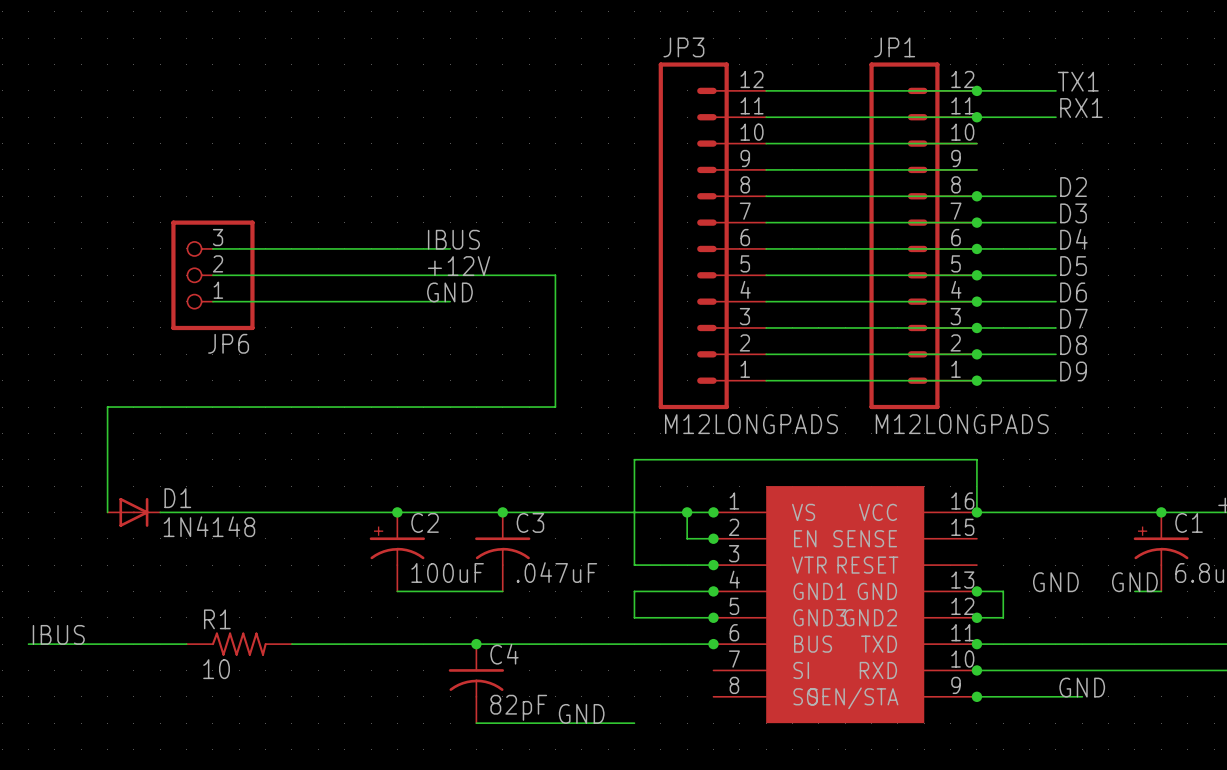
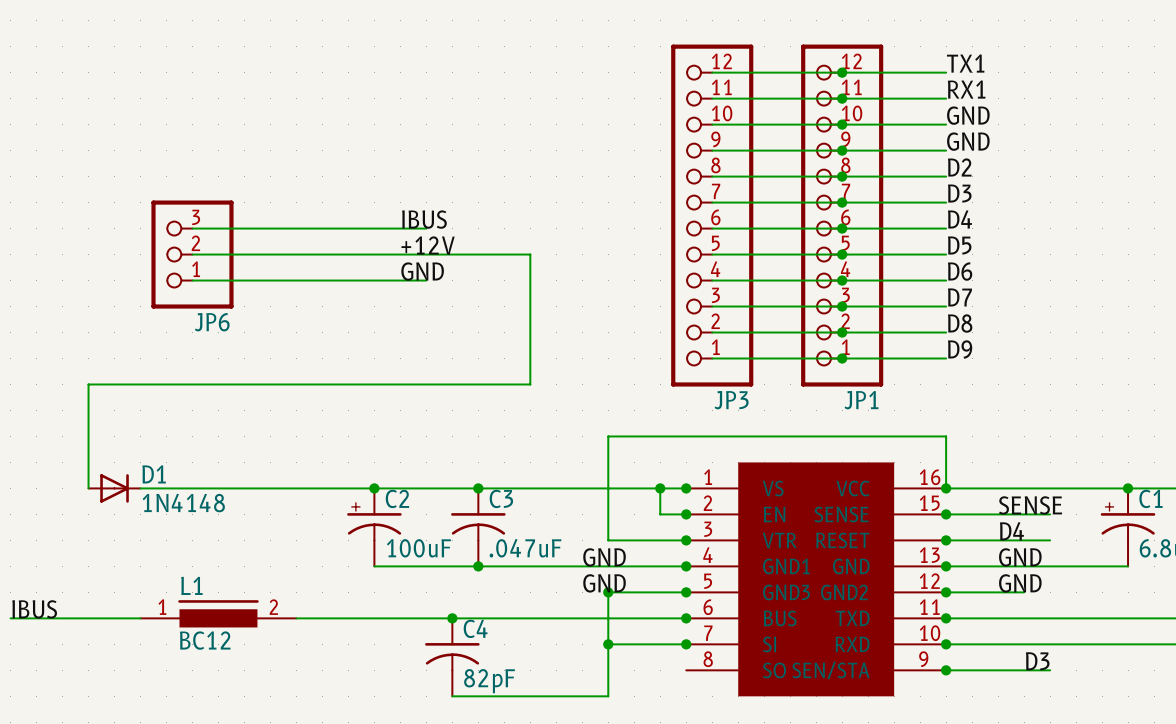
JP3 name position: JP3 (683, 47) -> JP3 (731, 400)
JP1 name position: JP1 (894, 47) -> JP1 (861, 400)
JP3 symbol: [658, 62, 767, 410] -> [671, 44, 754, 387]
JP1 symbol: [869, 62, 977, 410] -> [801, 44, 884, 387]
label position: TX1 (1078, 81) -> TX1 (965, 63)
junction: none -> (842, 72)
wire: (976, 90) (1055, 90) -> none
junction: (976, 90) -> none
label position: RX1 (1081, 108) -> RX1 (966, 89)
junction: none -> (842, 98)
wire: (976, 117) (1055, 117) -> none
junction: (976, 117) -> none
label: none -> GND (968, 115)
junction: none -> (842, 124)
label: none -> GND (968, 141)
junction: none -> (842, 150)
label position: D2 (1073, 187) -> D2 (959, 167)
junction: none -> (842, 176)
wire: (976, 196) (1055, 196) -> none
junction: (976, 196) -> none
label position: D3 (1073, 213) -> D3 (959, 193)
junction: none -> (842, 202)
wire: (976, 222) (1055, 222) -> none
junction: (976, 222) -> none
label position: D4 (1073, 239) -> D4 (959, 219)
junction: none -> (842, 228)
wire: (976, 248) (1055, 248) -> none
junction: (976, 248) -> none
label position: D5 (1073, 266) -> D5 (959, 245)
junction: none -> (842, 254)
wire: (976, 275) (1055, 275) -> none
junction: (976, 275) -> none
label position: D6 (1073, 292) -> D6 (960, 271)
junction: none -> (842, 280)
wire: (976, 301) (1055, 301) -> none
junction: (976, 301) -> none
label position: D7 (1073, 318) -> D7 (959, 297)
junction: none -> (842, 306)
wire: (976, 327) (1055, 327) -> none
junction: (976, 327) -> none
label position: D8 (1073, 345) -> D8 (960, 323)
junction: none -> (842, 332)
wire: (976, 354) (1055, 354) -> none
junction: (976, 354) -> none
label position: D9 (1073, 371) -> D9 (960, 349)
junction: none -> (842, 358)
wire: (976, 380) (1055, 380) -> none
junction: (976, 380) -> none
JP3 value: M12LONGPADS (751, 424) -> none
JP1 value: M12LONGPADS (962, 424) -> none
label: none -> SENSE (1030, 505)
wire: none -> (946, 514) (1050, 514)
junction: none -> (946, 514)
label: none -> D4 (1011, 531)
wire: none -> (946, 540) (1050, 540)
junction: none -> (946, 540)
label: none -> GND (604, 557)
label position: GND (1134, 582) -> GND (1020, 583)
wire: none -> (478, 566) (608, 566)
junction: none -> (478, 566)
wire: (634, 591) (634, 617) -> (608, 696) (608, 592)
wire: (1003, 591) (1003, 617) -> (1024, 592) (972, 592)
wire: none -> (972, 566) (1102, 566)
label: none -> GND (604, 583)
junction: none -> (608, 592)
L1: none -> BC12 (218, 613)
R1: 10 (239, 644) -> none
wire: none -> (608, 644) (686, 644)
junction: none -> (608, 644)
junction: none -> (686, 644)
label: GND (1082, 687) -> D3 (1037, 661)
label: GND (581, 713) -> none

